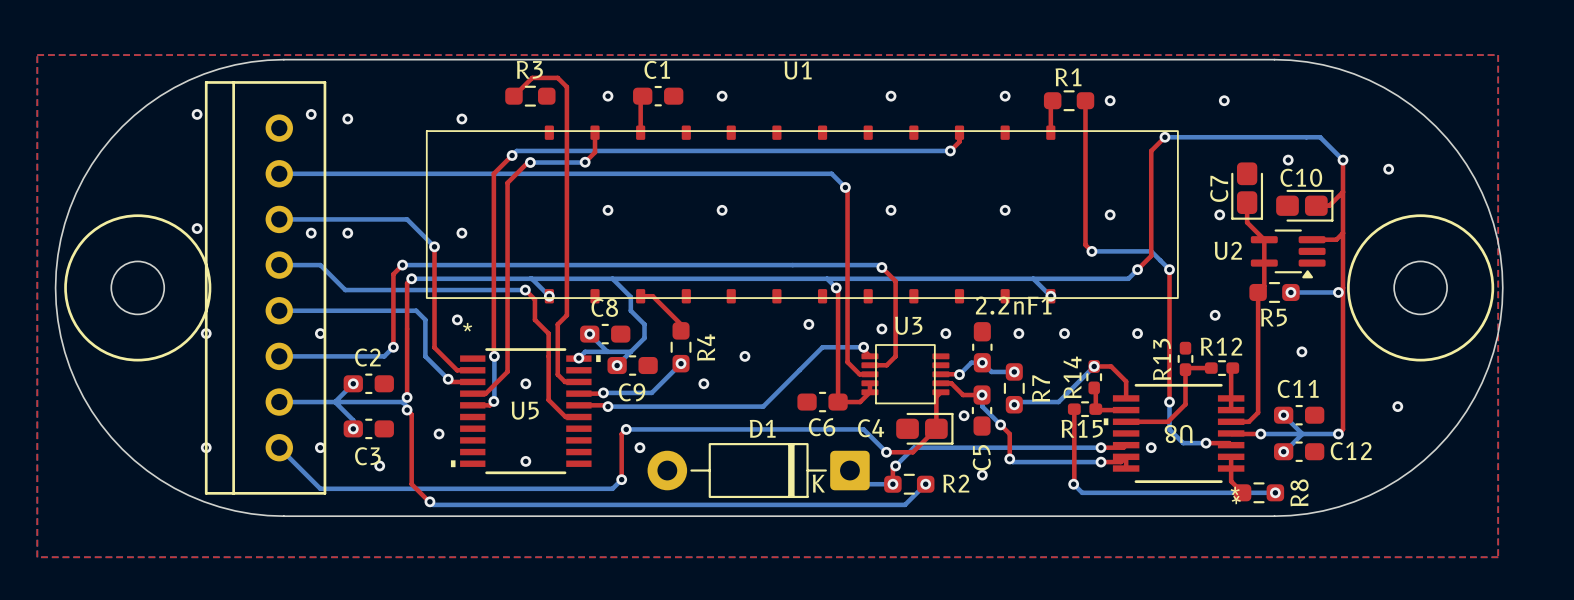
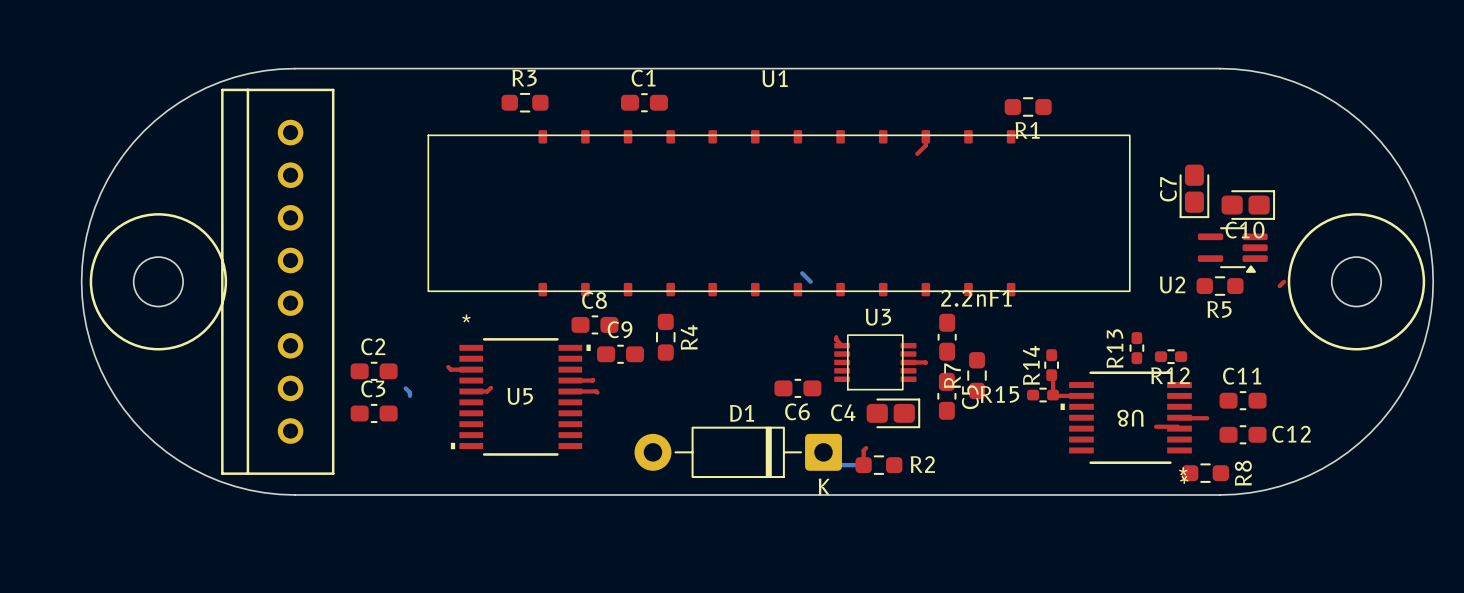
top zone outline: (37, 55) (1498, 55) (1498, 557) (37, 557) (37, 55) -> none
R1 name position: R1 (1068, 77) -> R1 (1027, 130)
top track: (513, 96) (532, 77) (557, 77) (566, 87) (566, 315) (557, 324) (557, 374) (565, 381) (578, 381) -> none
via: (607, 96) -> none
top track: (642, 96) (640, 98) (640, 132) -> none
via: (722, 96) -> none
via: (891, 96) -> none
via: (1005, 96) -> none
top track: (1052, 100) (1050, 102) (1050, 132) -> none
top track: (1085, 100) (1085, 244) (1091, 251) -> none
via: (1110, 100) -> none
via: (1224, 100) -> none
via: (197, 114) -> none
via: (311, 114) -> none
via: (347, 118) -> none
via: (461, 118) -> none
top track: (595, 132) (595, 152) (585, 162) -> none
top track: (1164, 137) (1151, 150) (1151, 255) (1137, 269) -> none
bottom track: (1164, 137) (1320, 137) (1343, 160) -> none
via: (1164, 137) -> none
bottom track: (950, 150) (516, 150) (512, 155) -> none
via: (950, 150) -> none
top track: (512, 155) (493, 173) (494, 356) -> none
via: (512, 155) -> none
via: (1288, 160) -> none
top track: (1343, 160) (1343, 429) (1338, 434) -> none
via: (1343, 160) -> none
top track: (530, 162) (527, 162) (507, 182) (507, 371) (485, 393) (472, 393) -> none
via: (530, 162) -> none
bottom track: (585, 162) (530, 162) -> none
via: (585, 162) -> none
via: (1388, 169) -> none
bottom track: (279, 173) (831, 173) (845, 187) -> none
C10 name position: C10 (1301, 177) -> C10 (1245, 230)
top track: (845, 187) (847, 189) (847, 362) (859, 374) (869, 374) -> none
via: (845, 187) -> none
top track: (1343, 192) (1329, 205) (1316, 205) -> none
top track: (1247, 202) (1247, 222) (1264, 239) (1264, 286) (1258, 292) (1258, 412) (1248, 421) (1231, 421) -> none
via: (607, 210) -> none
via: (722, 210) -> none
via: (891, 210) -> none
via: (1005, 210) -> none
via: (1110, 214) -> none
via: (1219, 214) -> none
bottom track: (279, 219) (407, 219) (434, 246) -> none
via: (197, 228) -> none
via: (311, 233) -> none
via: (347, 233) -> none
via: (461, 233) -> none
top track: (1343, 233) (1336, 239) (1312, 239) -> none
top track: (434, 246) (434, 347) (457, 370) (472, 370) -> none
via: (434, 246) -> none
U2 name position: U2 (1228, 250) -> U2 (1172, 284)
bottom track: (1091, 251) (1151, 251) (1169, 269) -> none
via: (1091, 251) -> none
bottom track: (279, 265) (320, 265) (345, 290) (525, 290) -> none
top track: (402, 265) (393, 274) (393, 347) -> none
bottom track: (402, 265) (879, 265) (881, 267) -> none
via: (402, 265) -> none
top track: (881, 267) (895, 281) (895, 356) (886, 365) (869, 365) -> none
via: (881, 267) -> none
bottom track: (1137, 269) (1128, 278) (411, 278) -> none
via: (1137, 269) -> none
top track: (1169, 269) (1169, 402) -> none
via: (1169, 269) -> none
top track: (411, 278) (407, 283) (407, 397) -> none
via: (411, 278) -> none
bottom track: (531, 278) (549, 296) -> none
bottom track: (612, 278) (630, 297) (630, 310) (644, 324) (644, 338) (617, 365) -> none
bottom track: (1033, 278) (1050, 296) -> none
top track: (836, 287) (838, 289) (838, 402) (860, 402) (869, 392) (869, 383) -> none
via: (836, 287) -> none
top track: (525, 290) (534, 299) (534, 319) (548, 333) (548, 400) (565, 417) (578, 417) -> none
via: (525, 290) -> none
bottom track: (1290, 292) (1338, 292) -> none
via: (1290, 292) -> none
via: (1338, 292) -> none
via: (549, 296) -> none
top track: (640, 296) (652, 296) (681, 324) (681, 330) -> none
via: (1050, 296) -> none
bottom track: (279, 310) (416, 310) (425, 319) (425, 356) (448, 379) -> none
via: (1215, 315) -> none
via: (457, 319) -> none
via: (808, 324) -> none
via: (881, 329) -> none
via: (206, 333) -> none
via: (320, 333) -> none
via: (945, 333) -> none
via: (1018, 333) -> none
via: (1064, 333) -> none
via: (1137, 333) -> none
bottom track: (589, 334) (607, 351) -> none
via: (589, 334) -> none
R12 name position: R12 (1221, 346) -> R12 (1170, 375)
bottom track: (393, 347) (384, 356) (279, 356) -> none
via: (393, 347) -> none
bottom track: (863, 347) (822, 347) (763, 406) (607, 406) -> none
via: (863, 347) -> none
bottom track: (630, 351) (585, 351) (578, 358) -> none
via: (1301, 351) -> none
bottom track: (494, 356) (493, 401) -> none
via: (494, 356) -> none
via: (744, 356) -> none
via: (578, 358) -> none
via: (982, 362) -> none
bottom track: (681, 363) (651, 392) (603, 392) -> none
via: (681, 363) -> none
via: (617, 365) -> none
top track: (1094, 366) (1111, 366) (1126, 381) (1126, 398) -> none
bottom track: (1094, 366) (1058, 402) (1017, 402) (1014, 404) -> none
via: (1094, 366) -> none
top track: (1211, 368) (1187, 368) (1185, 369) (1185, 404) (1168, 421) (1126, 421) -> none
top track: (1232, 368) (1231, 369) (1231, 410) -> none
bottom track: (1014, 371) (991, 371) (982, 362) (971, 362) (959, 374) -> none
via: (1014, 371) -> none
via: (959, 374) -> none
via: (448, 379) -> none
bottom track: (353, 383) (335, 402) (353, 420) (353, 428) -> none
via: (353, 383) -> none
via: (525, 383) -> none
via: (703, 383) -> none
top track: (940, 383) (951, 383) (963, 395) (982, 395) -> none
R7 name position: R7 (1041, 388) -> R7 (952, 375)
via: (603, 392) -> none
C9 name position: C9 (632, 392) -> C9 (620, 329)
top track: (940, 392) (936, 396) (936, 428) (912, 452) (886, 452) -> none
bottom track: (982, 395) (982, 406) (1000, 424) -> none
via: (982, 395) -> none
bottom track: (407, 397) (402, 402) (279, 402) -> none
via: (407, 397) -> none
via: (493, 401) -> none
bottom track: (1169, 402) (1169, 429) (1183, 443) (1206, 443) -> none
via: (1169, 402) -> none
via: (1014, 404) -> none
via: (607, 406) -> none
via: (1397, 406) -> none
top track: (1074, 409) (1073, 484) -> none
top track: (407, 410) (411, 414) (411, 484) (429, 501) -> none
via: (407, 410) -> none
via: (964, 415) -> none
bottom track: (1283, 415) (1302, 434) (1283, 451) -> none
via: (1283, 415) -> none
top track: (1000, 424) (1009, 434) (1009, 458) -> none
via: (1000, 424) -> none
via: (353, 428) -> none
R15 name position: R15 (1082, 428) -> R15 (999, 394)
top track: (626, 429) (621, 434) (621, 479) -> none
bottom track: (626, 429) (863, 429) (886, 452) -> none
via: (626, 429) -> none
via: (439, 434) -> none
bottom track: (1260, 434) (1338, 434) -> none
via: (1260, 434) -> none
via: (1338, 434) -> none
via: (1206, 443) -> none
top track: (1126, 445) (1123, 447) (1101, 447) -> none
via: (206, 447) -> none
bottom track: (279, 447) (320, 488) (612, 488) (621, 479) -> none
via: (320, 447) -> none
via: (639, 447) -> none
bottom track: (1101, 447) (913, 447) (895, 465) -> none
via: (1101, 447) -> none
via: (1151, 447) -> none
via: (1283, 451) -> none
via: (886, 452) -> none
C3 name position: C3 (367, 456) -> C3 (373, 388)
top track: (1231, 456) (1231, 481) (1242, 492) -> none
C5 name position: C5 (981, 457) -> C5 (970, 397)
bottom track: (1009, 458) (1012, 462) (1101, 462) -> none
via: (1009, 458) -> none
via: (525, 461) -> none
top track: (1101, 462) (1120, 462) (1126, 456) (1126, 468) -> none
via: (1101, 462) -> none
via: (379, 465) -> none
via: (895, 465) -> none
via: (982, 475) -> none
via: (621, 479) -> none
D1 text position: K (818, 483) -> K (824, 486)
via: (892, 484) -> none
bottom track: (925, 484) (905, 504) (433, 504) (429, 501) -> none
via: (925, 484) -> none
bottom track: (1073, 484) (1082, 492) (1275, 492) -> none
via: (1073, 484) -> none
via: (1275, 492) -> none
via: (429, 501) -> none

